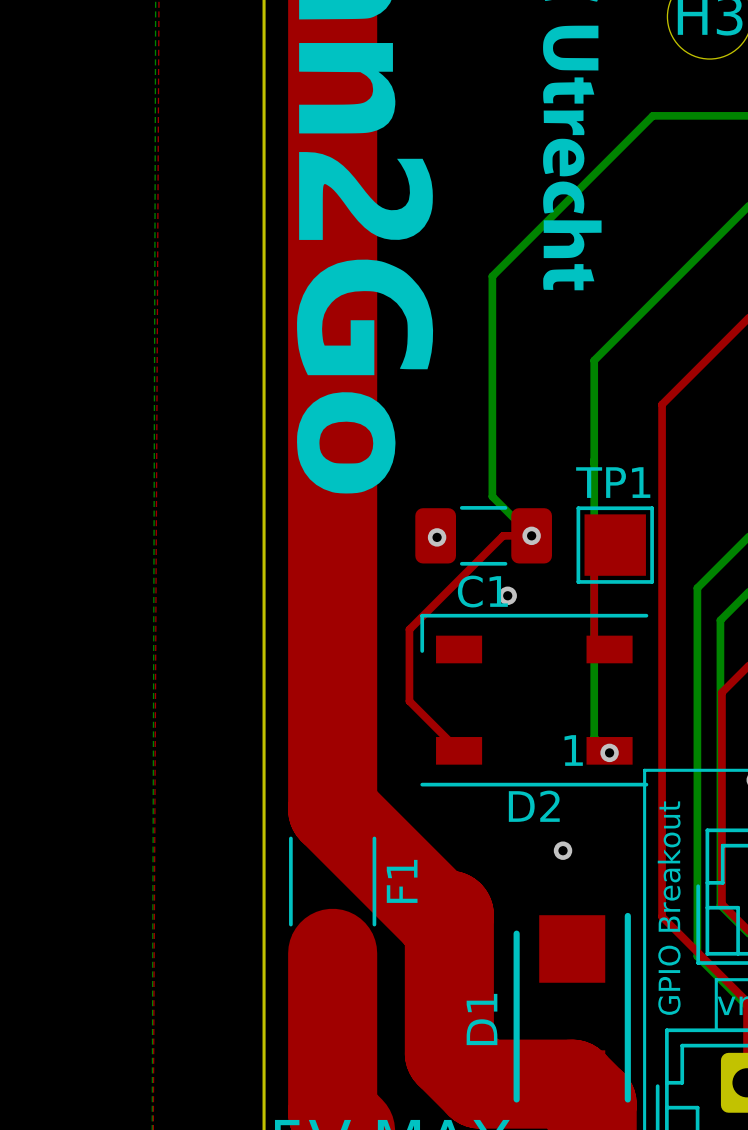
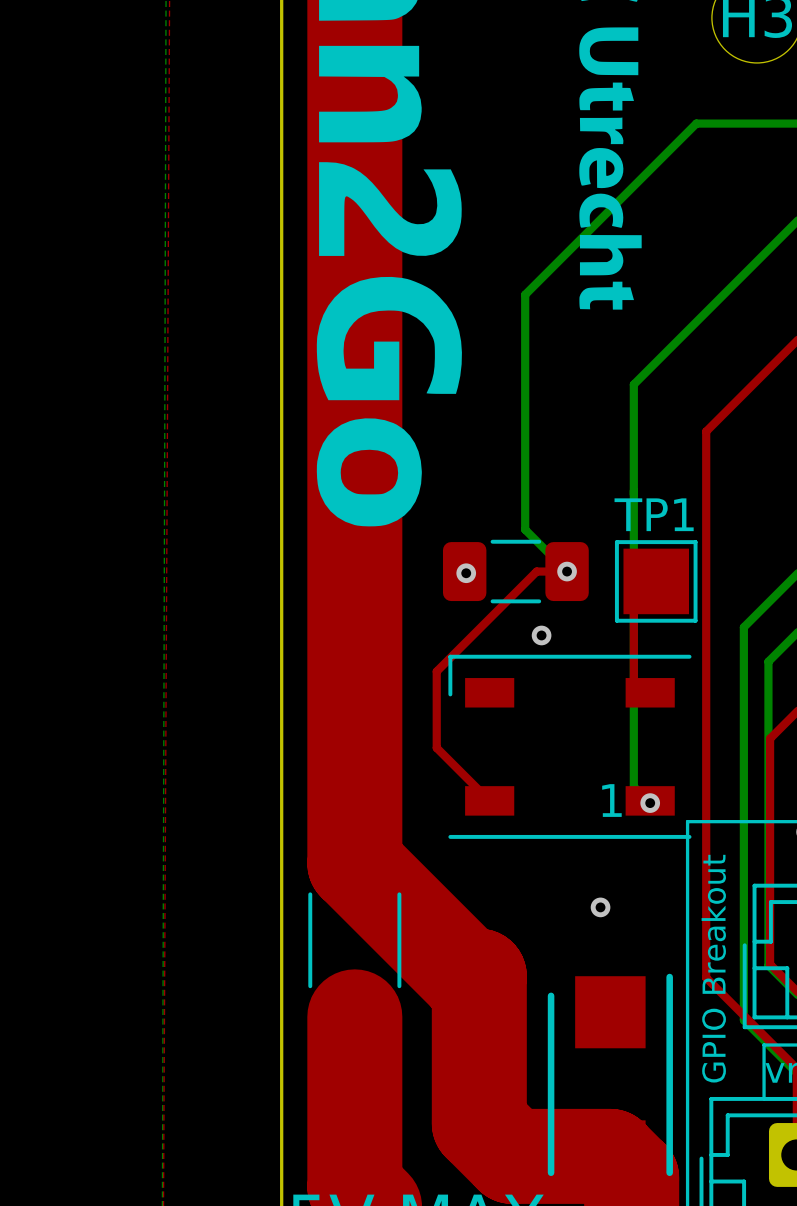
C1 name: C1 (482, 591) -> none
D2 name: D2 (534, 806) -> none
F1 name: F1 (402, 881) -> none
D1 name: D1 (482, 1019) -> none

